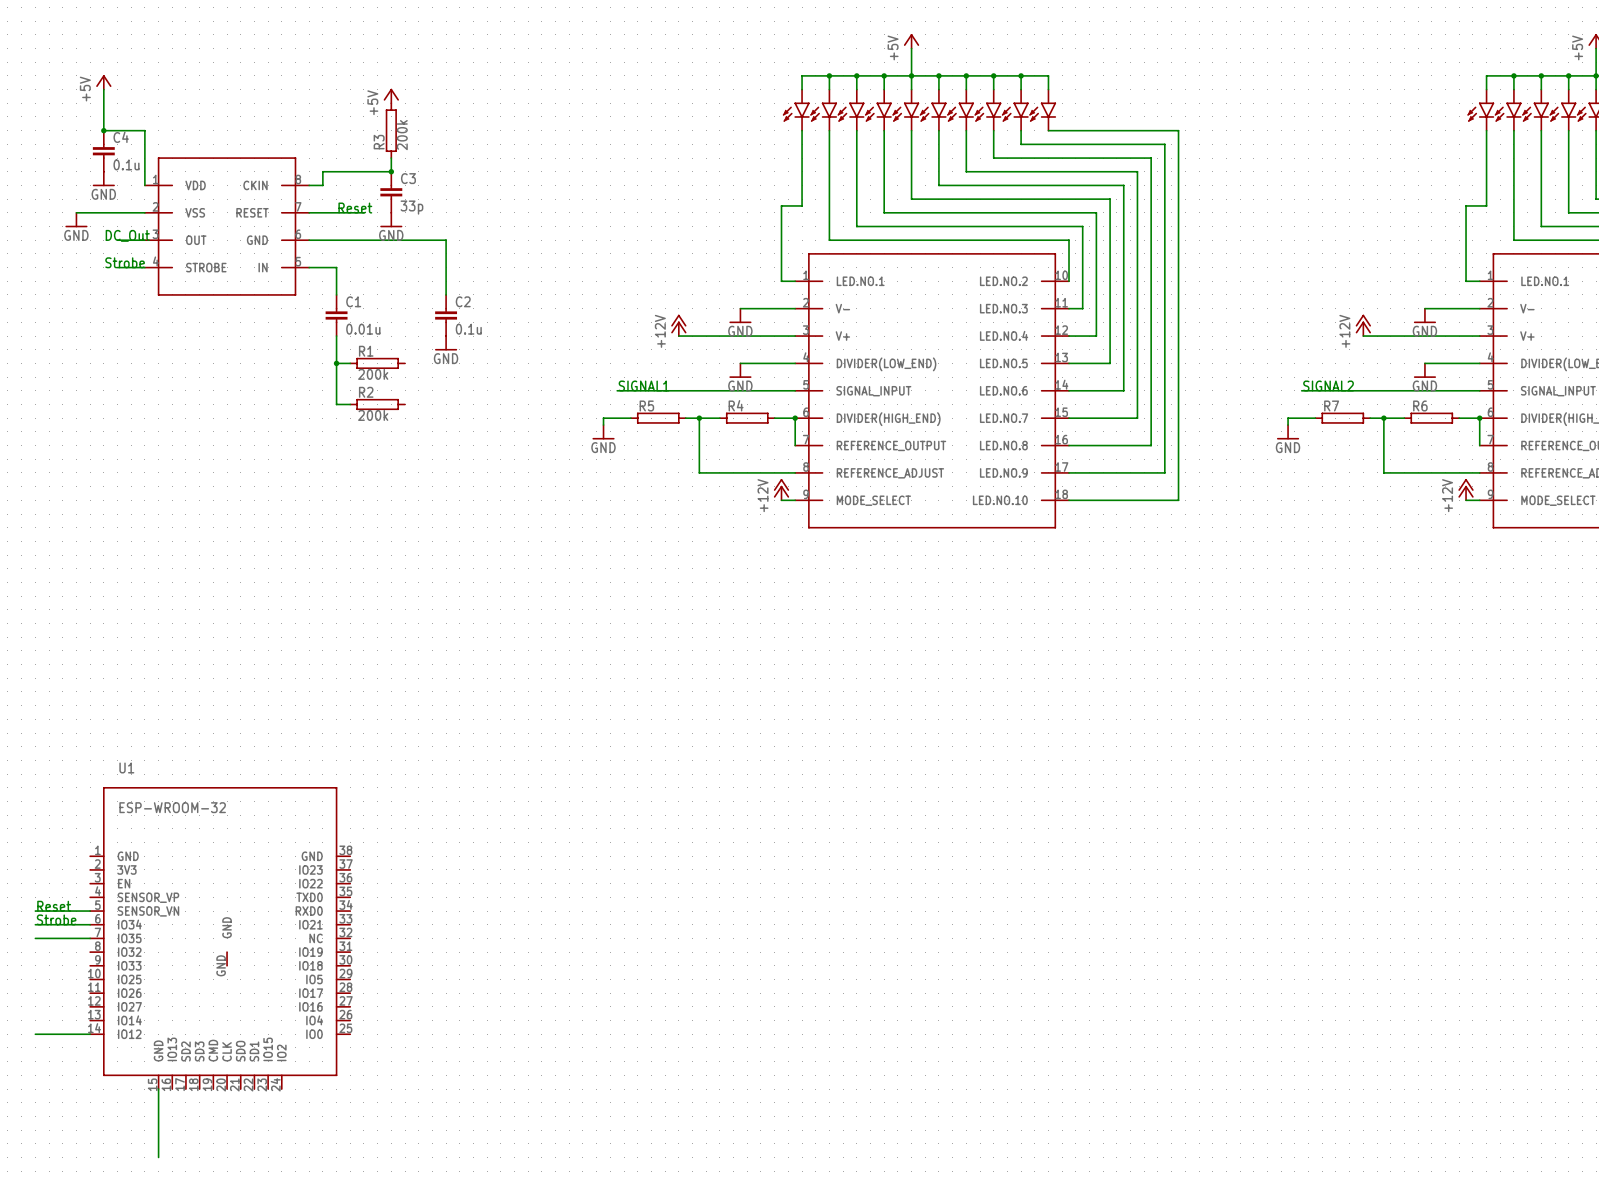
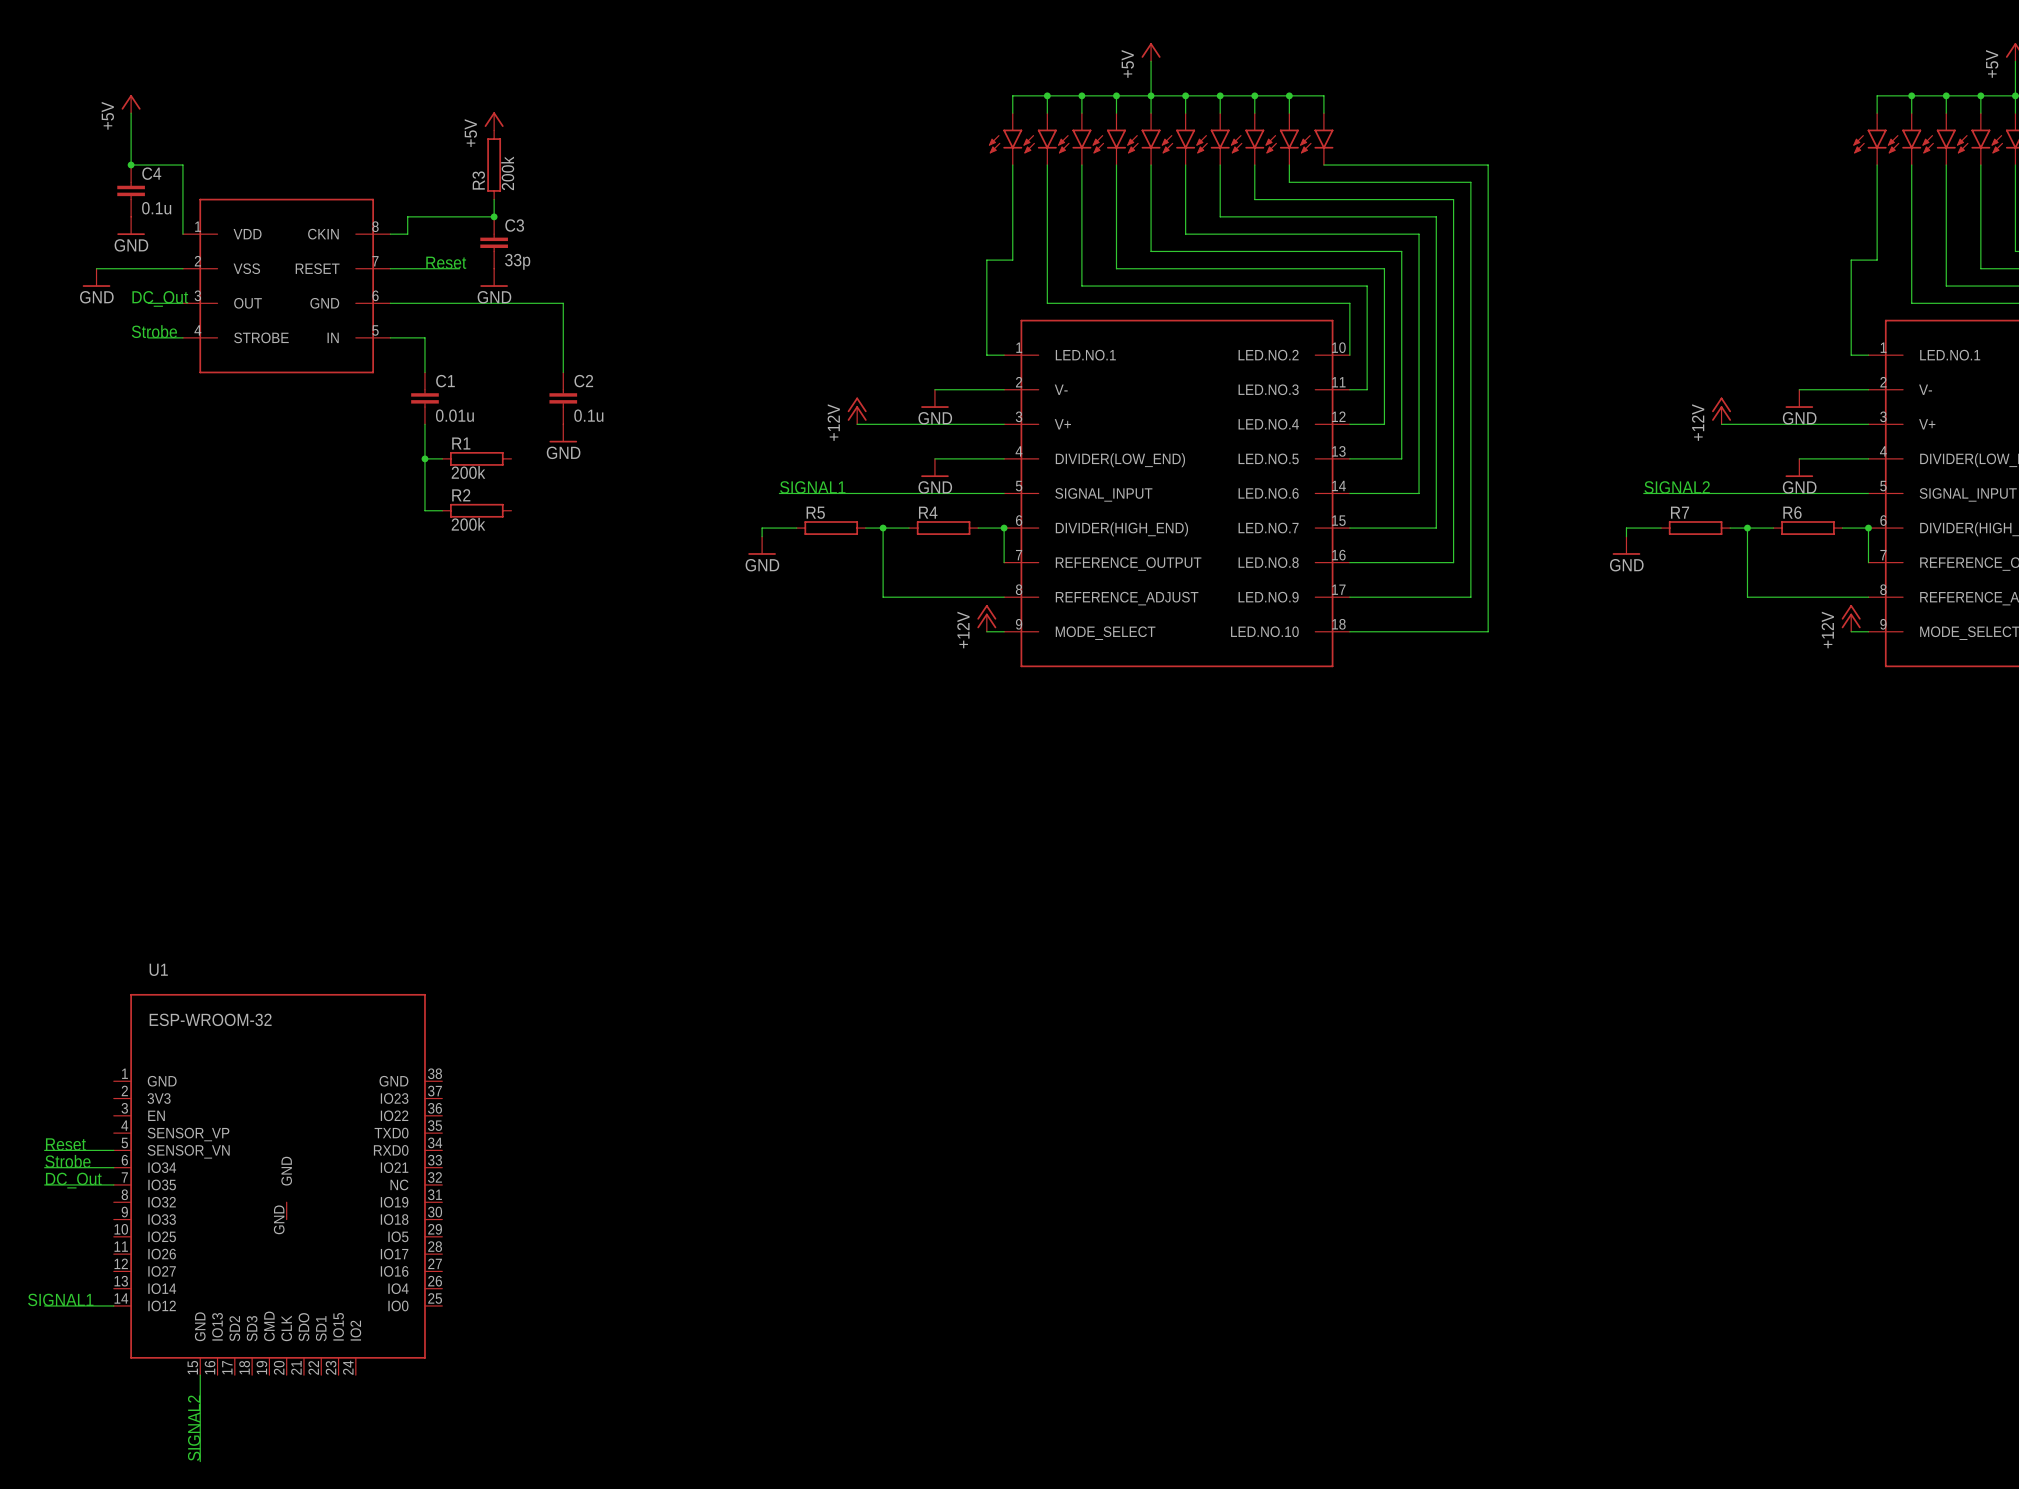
text: none -> DC_Out (73, 1180)
text: none -> SIGNAL1 (60, 1299)
text: none -> SIGNAL2 (194, 1428)

